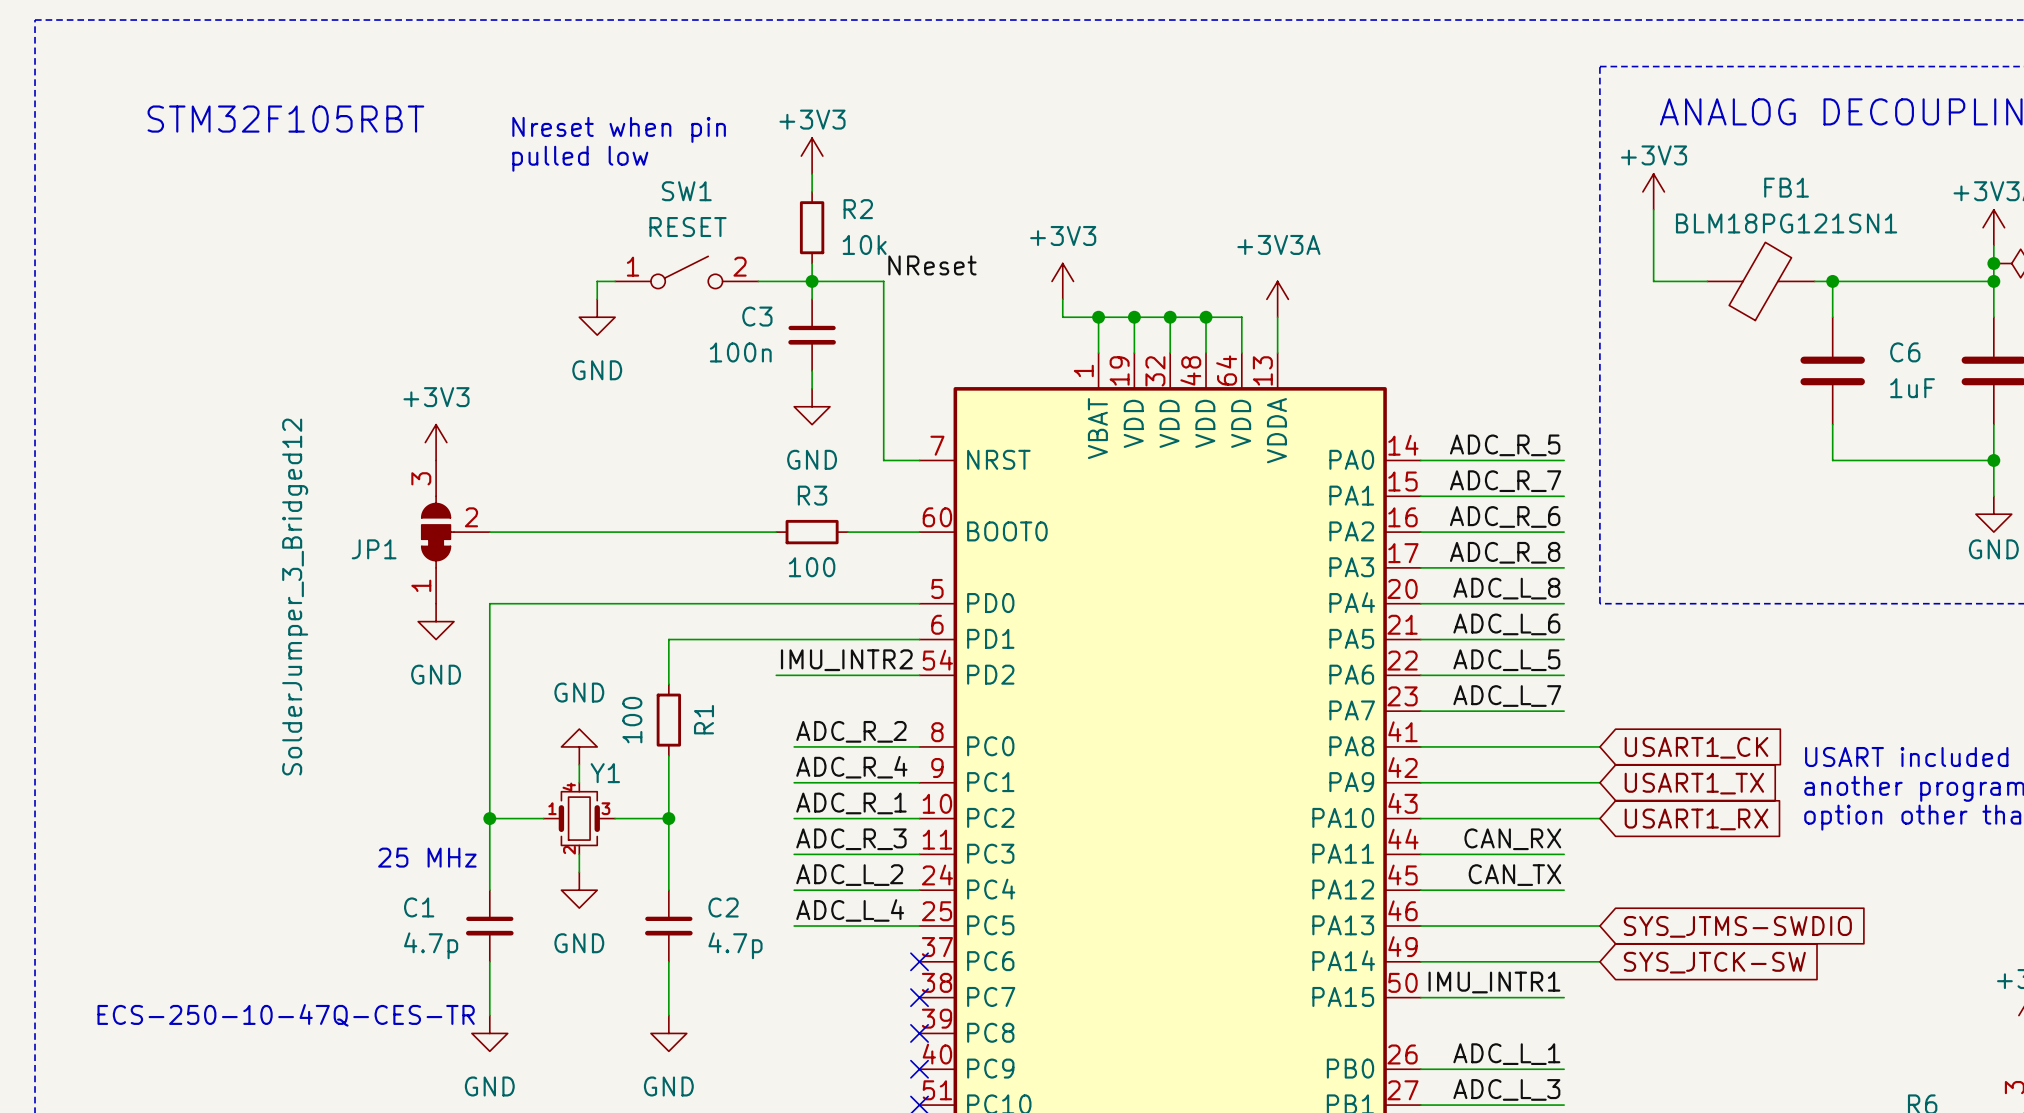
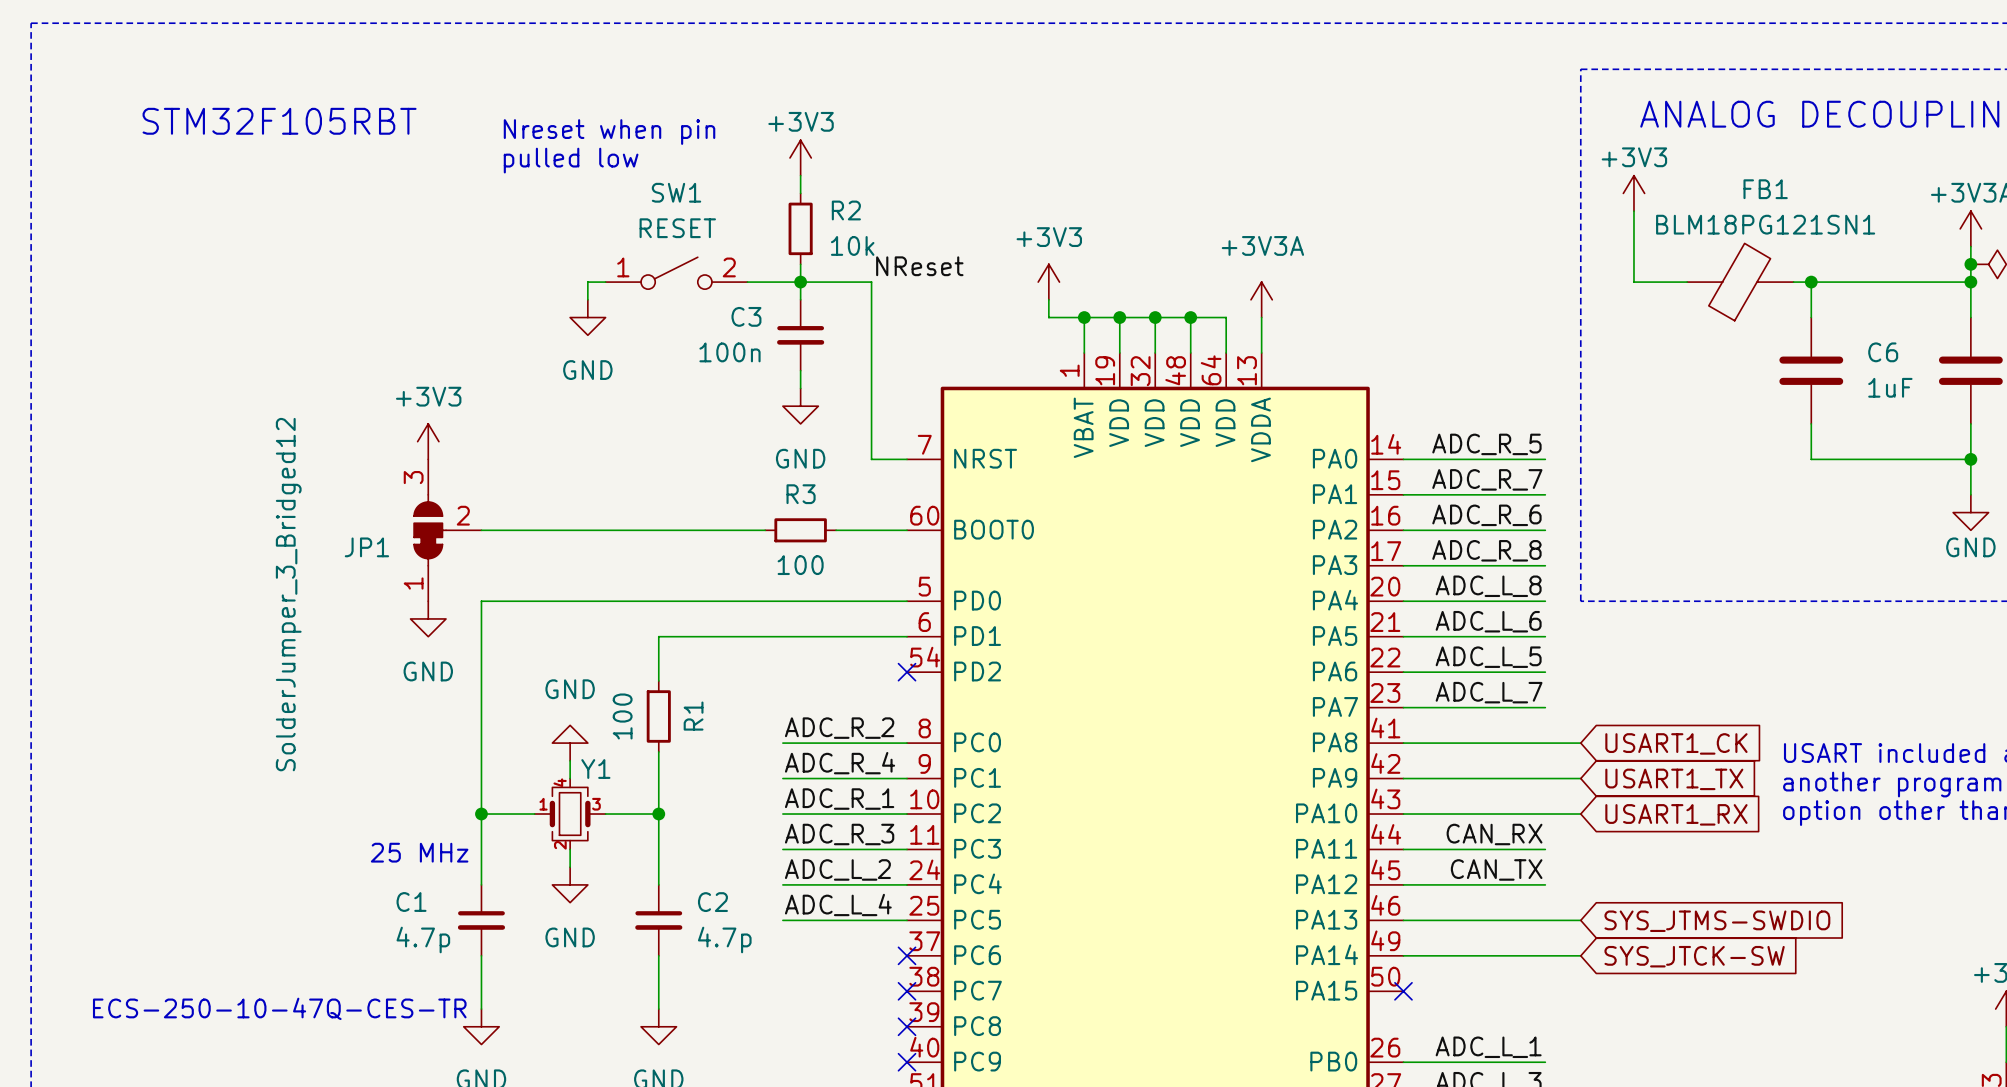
label: IMU_INTR2 (846, 660) -> none
wire: (776, 675) (919, 675) -> none
no-connect mark: none -> (907, 672)
label: IMU_INTR1 (1494, 982) -> none
wire: (1420, 997) (1564, 997) -> none
no-connect mark: none -> (1403, 991)

